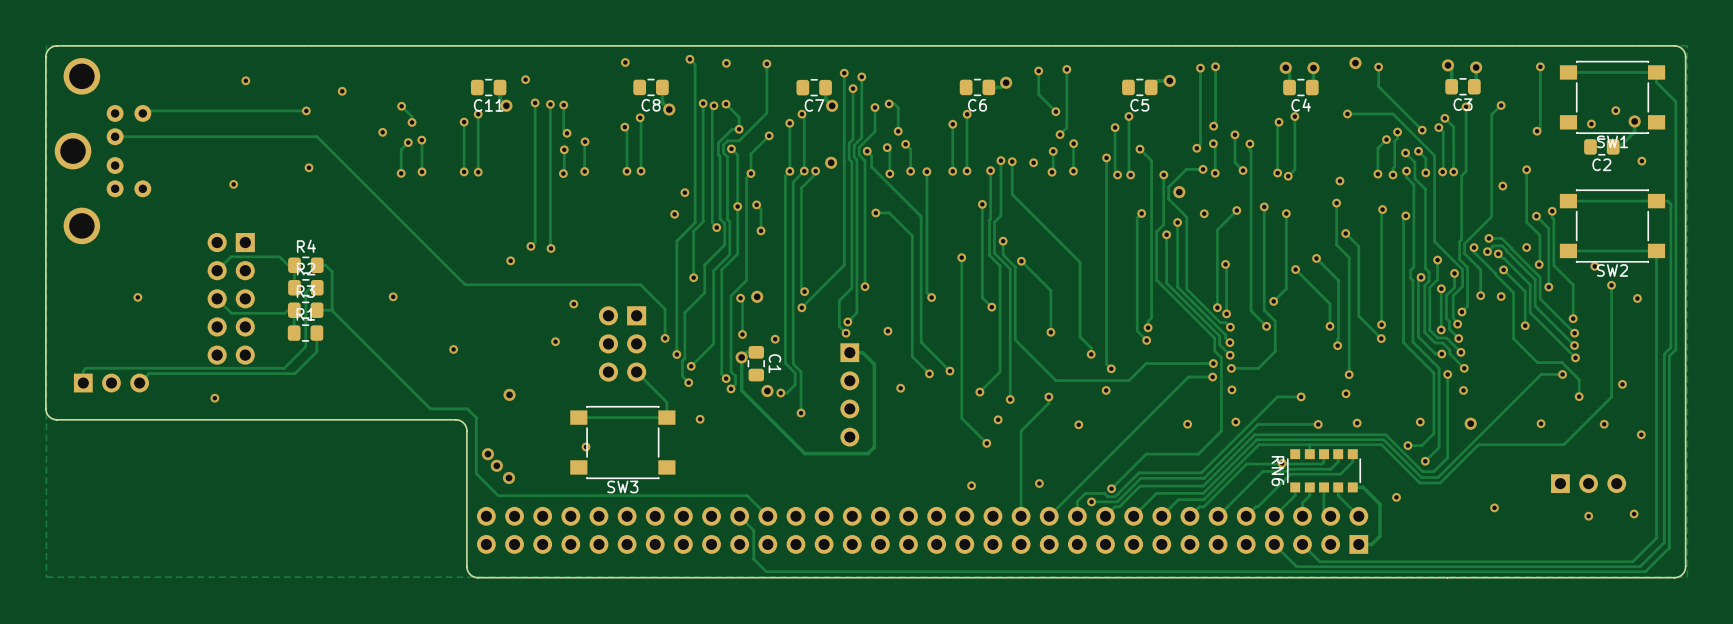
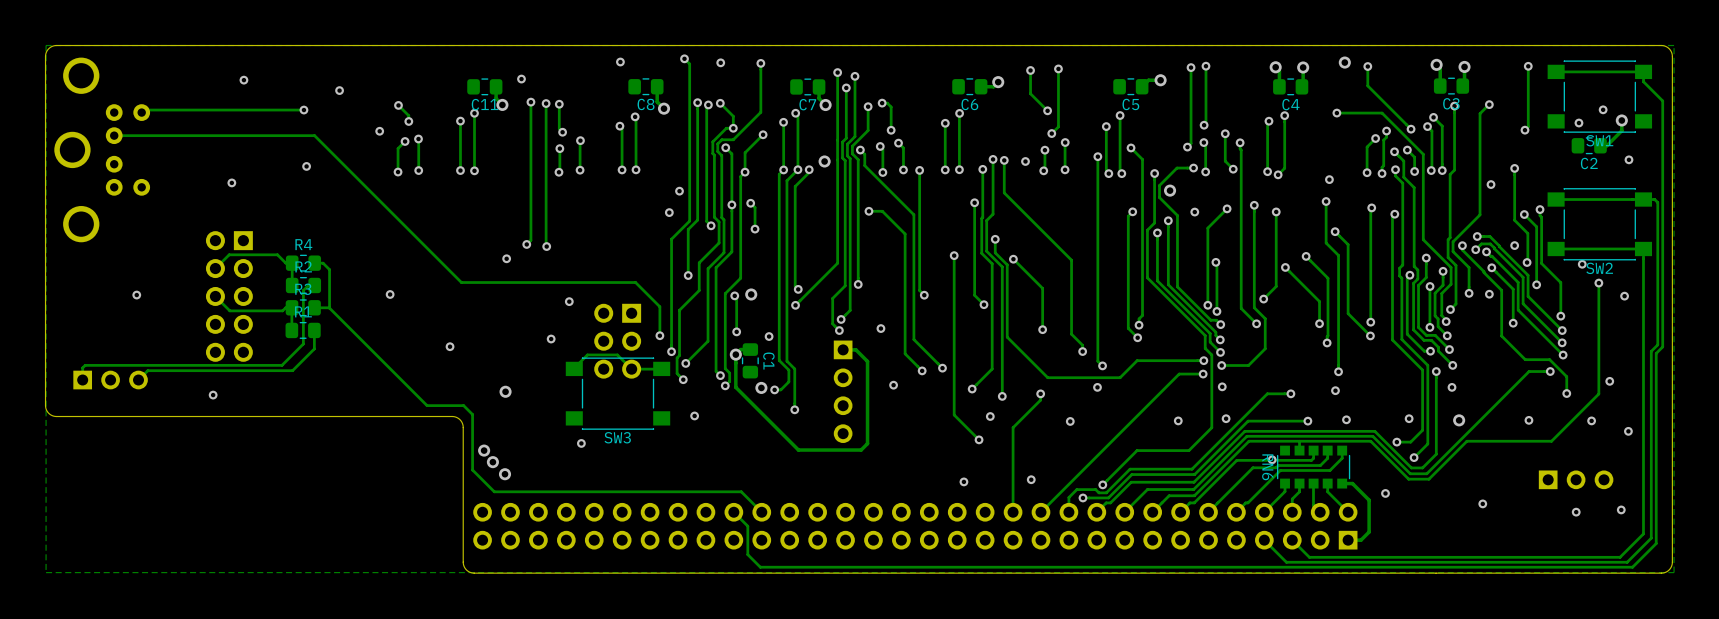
track: none -> (573, 368) (587, 354) (617, 354) (631, 369) (661, 368)
track: (636, 372) (666, 402) (666, 417) (578, 417) -> none
SW3 position: (622, 442) -> (618, 393)

